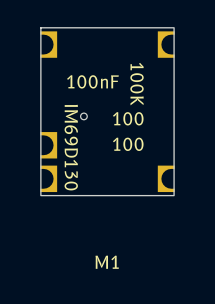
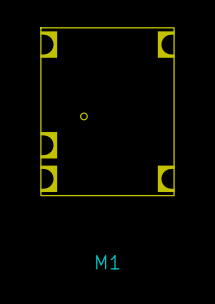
part: 100nF (92, 81) -> none
part: 100K (137, 84) -> none
part: 100 (128, 118) -> none
part: 100 (128, 144) -> none
part value: IM69D130 (71, 147) -> none

